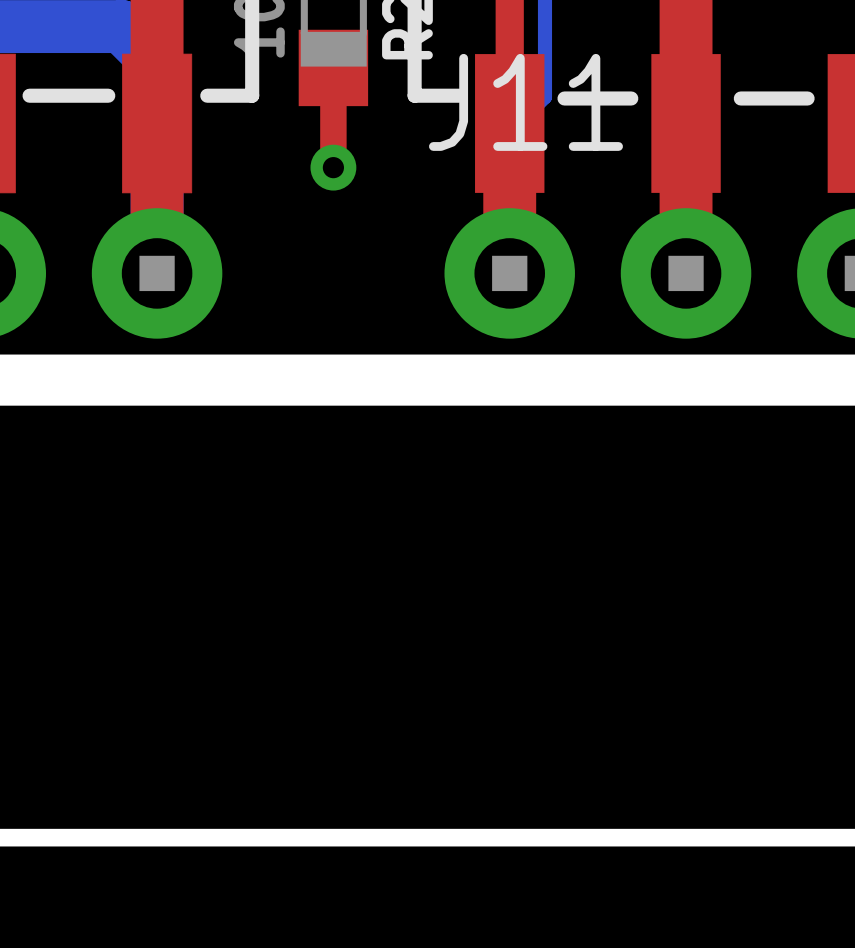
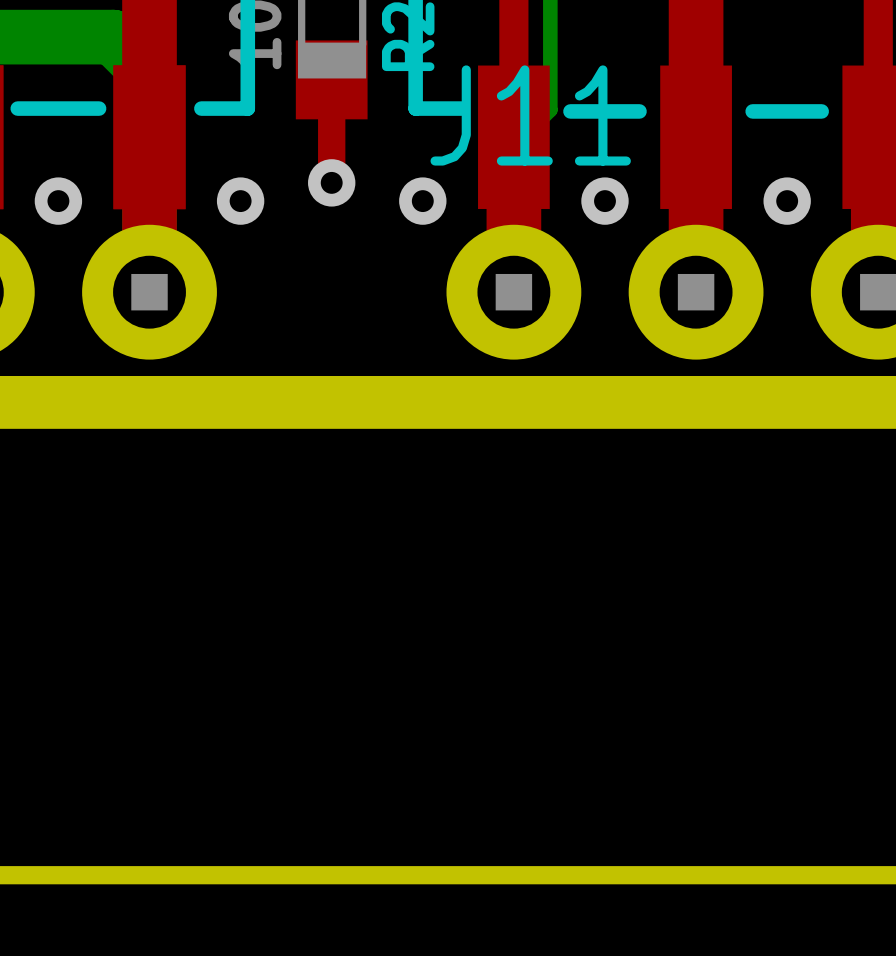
via: none -> (58, 201)
via: none -> (240, 201)
via: none -> (422, 201)
via: none -> (604, 201)
via: none -> (787, 201)

